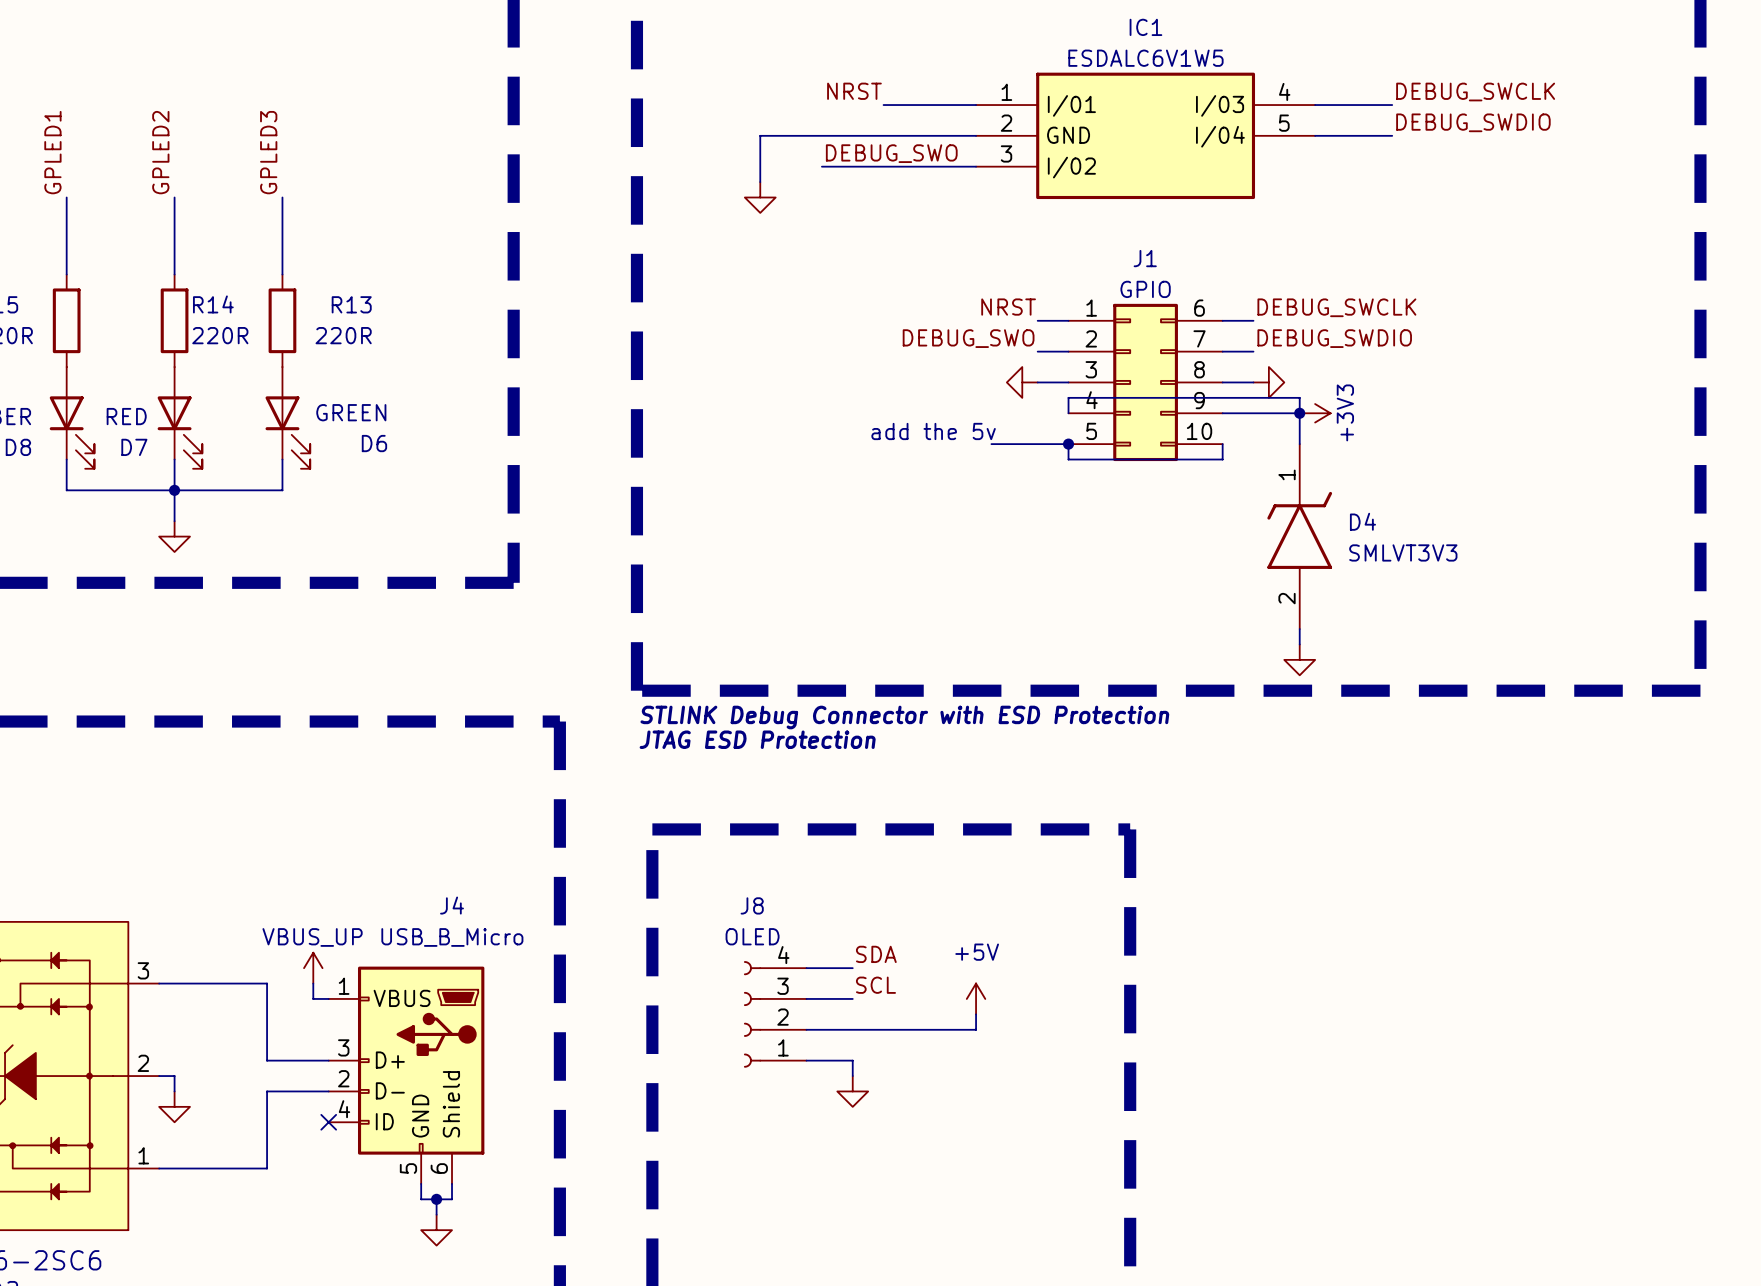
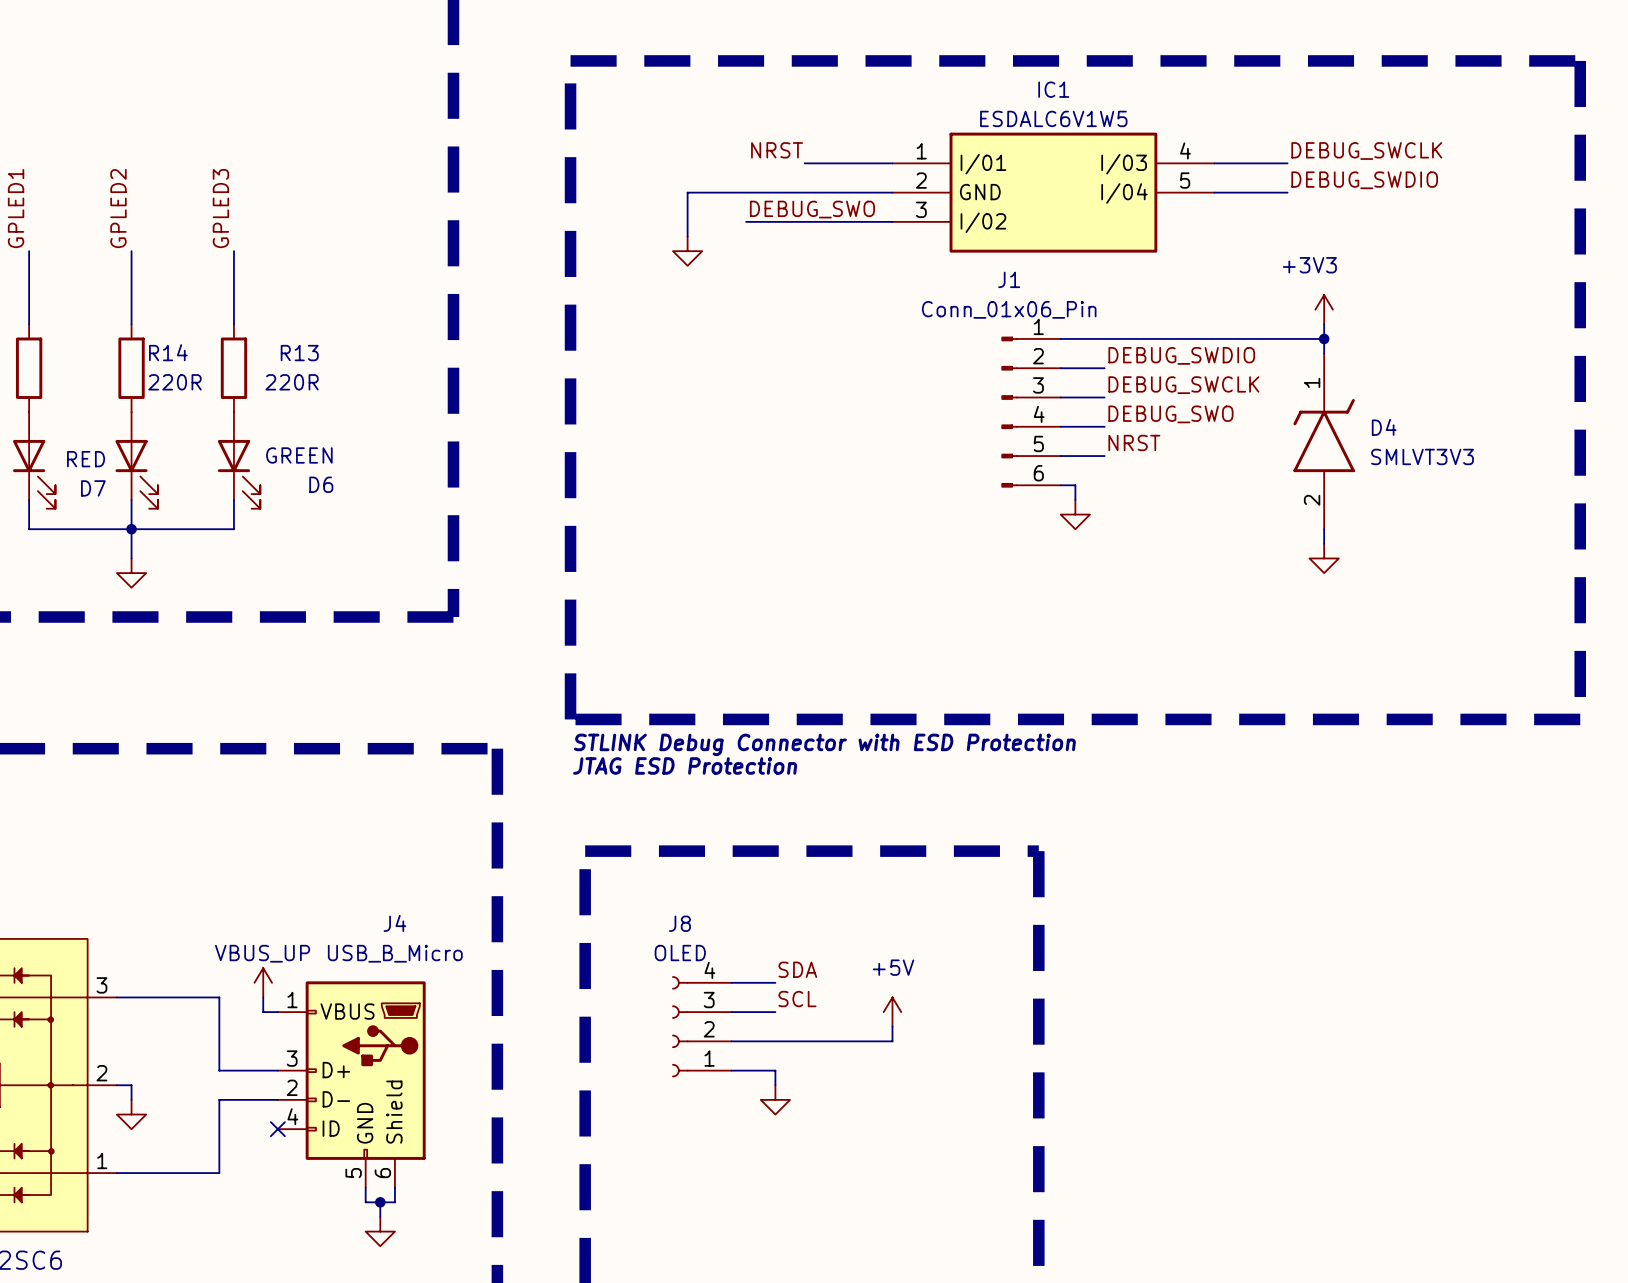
J1 name position: J1 (1145, 258) -> J1 (1009, 279)
wire: none -> (1324, 324) (1324, 353)
J1 value: GPIO (1145, 289) -> Conn_01x06_Pin (1009, 309)
wire: none -> (1060, 338) (1324, 338)
junction: none -> (1324, 338)
J1 symbol: [1068, 303, 1223, 462] -> [1001, 336, 1061, 488]
label position: NRST (1008, 307) -> NRST (1134, 442)
label position: DEBUG_SWCLK (1336, 307) -> DEBUG_SWCLK (1183, 385)
wire: (1037, 320) (1068, 320) -> none
wire: (1222, 320) (1253, 320) -> none
label position: DEBUG_SWO (968, 338) -> DEBUG_SWO (1170, 414)
label position: DEBUG_SWDIO (1334, 338) -> DEBUG_SWDIO (1181, 355)
wire: (1037, 351) (1068, 351) -> none
wire: (1222, 351) (1253, 351) -> none
power symbol: (1022, 382) -> none
wire: (1037, 382) (1068, 382) -> none
wire: (1222, 382) (1253, 382) -> none
power symbol: (1268, 382) -> none
wire: (1068, 413) (1068, 397) (1299, 397) (1299, 444) -> none
wire: (1222, 413) (1299, 413) -> none
junction: (1299, 413) -> none
power symbol rotation: 0° (1315, 413) -> 90° counterclockwise (1324, 309)
power symbol position: +3V3 (1315, 413) -> +3V3 (1324, 309)
text: add the 5v (933, 431) -> none
wire: (991, 444) (1068, 444) (1068, 459) (1222, 459) (1222, 444) -> none
junction: (1068, 444) -> none
power symbol: none -> (1075, 514)
power symbol: none -> (1324, 558)
D4 position: (1299, 536) -> (1324, 441)
wire: (1299, 629) (1299, 644) -> (1324, 529) (1324, 543)
power symbol: (1299, 659) -> none

